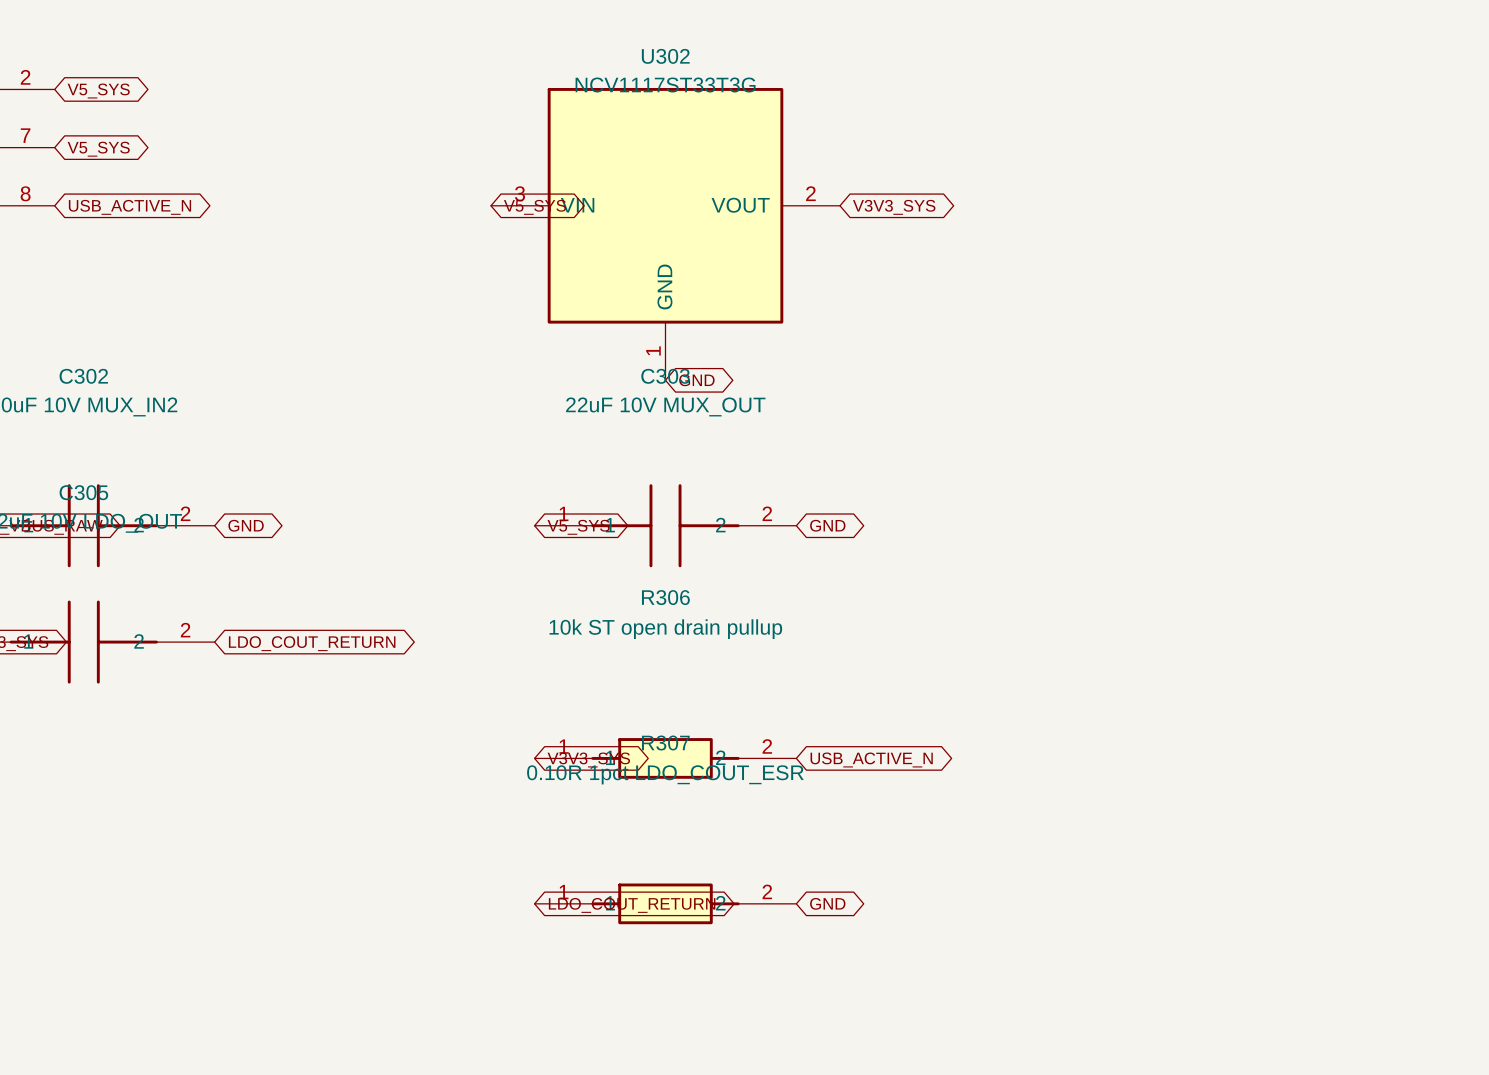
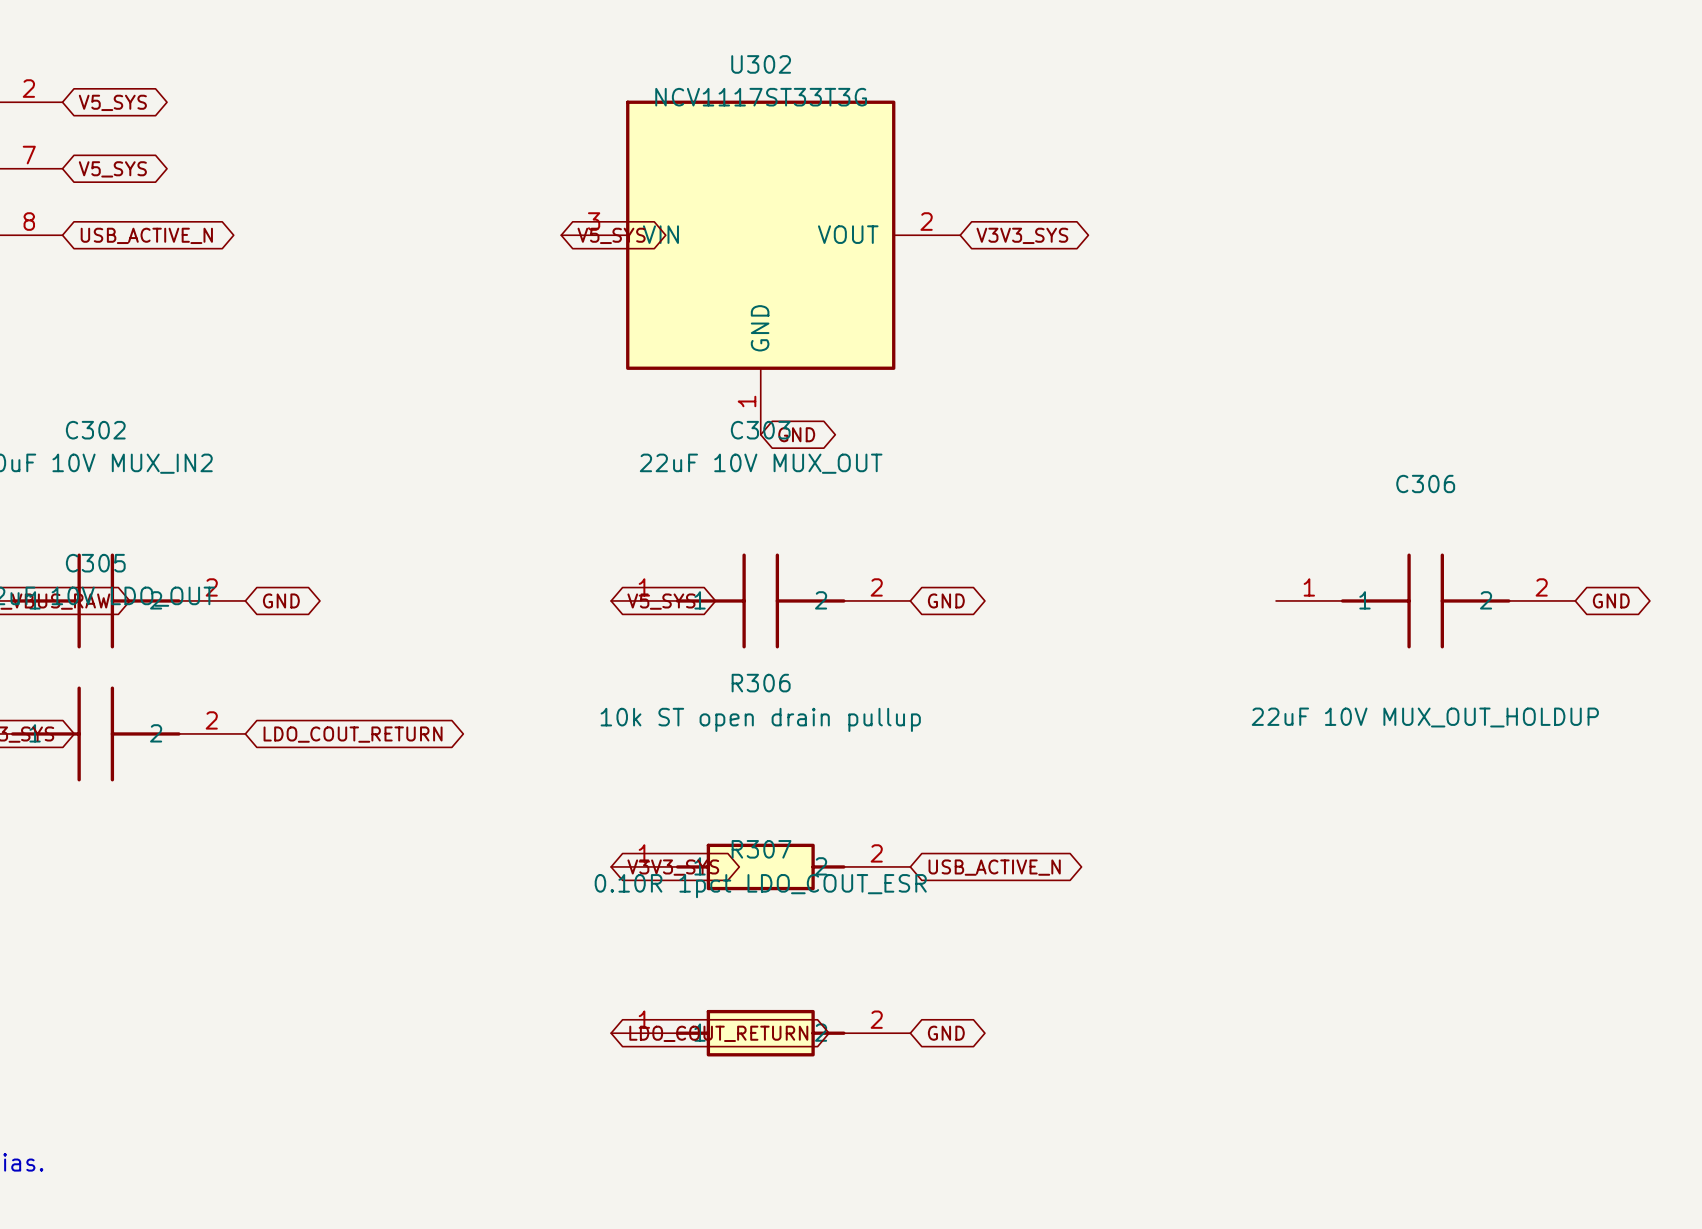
C306: none -> 22uF 10V MUX_OUT_HOLDUP (1425, 600)
global label: none -> GND (1611, 600)

